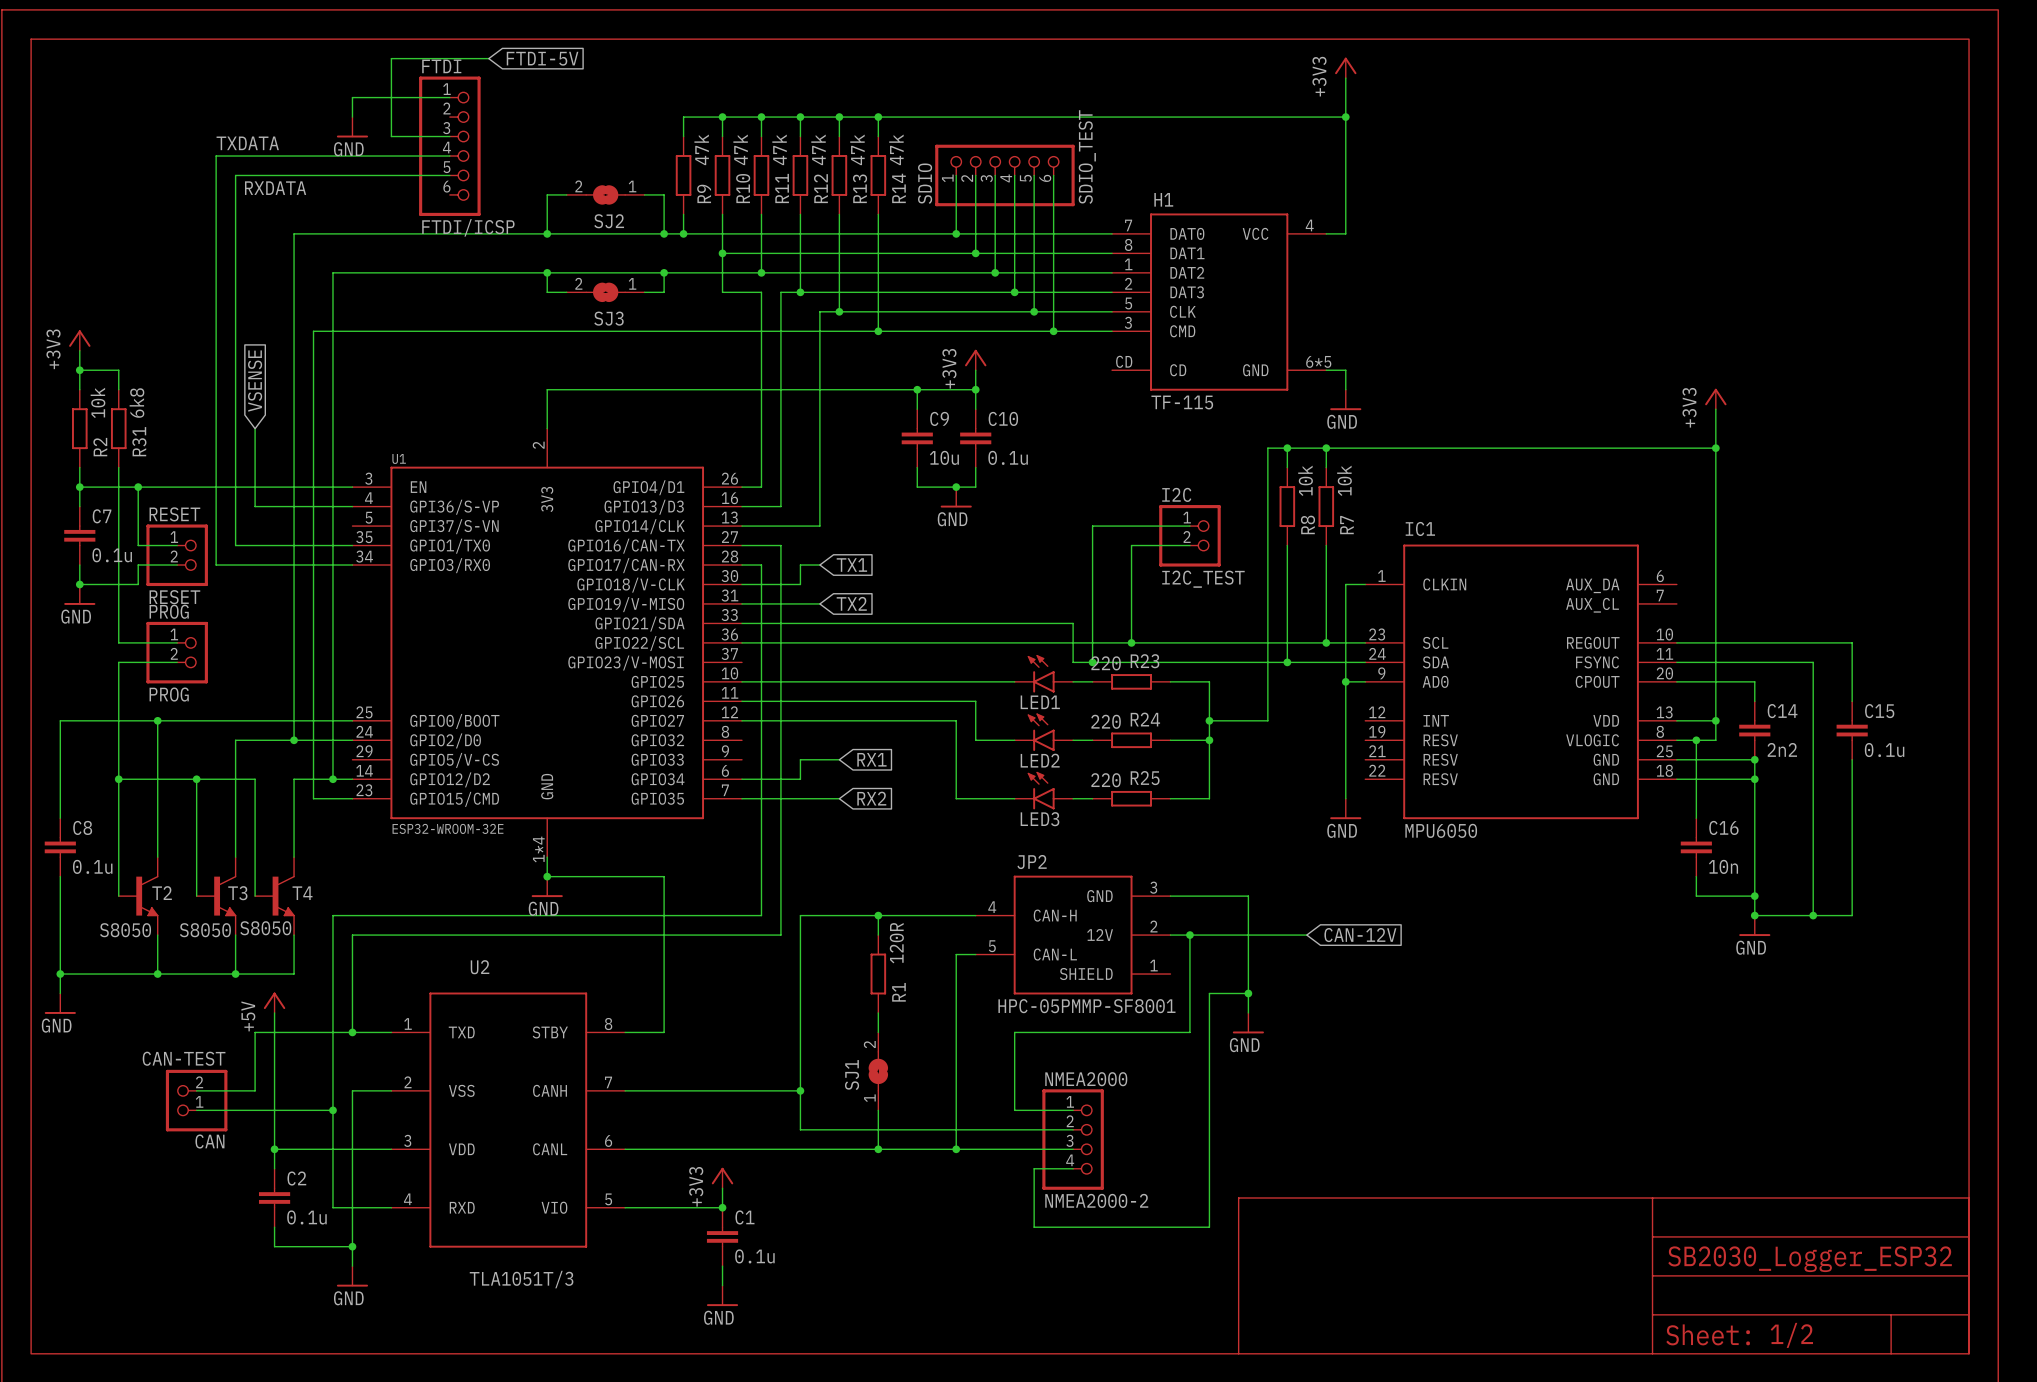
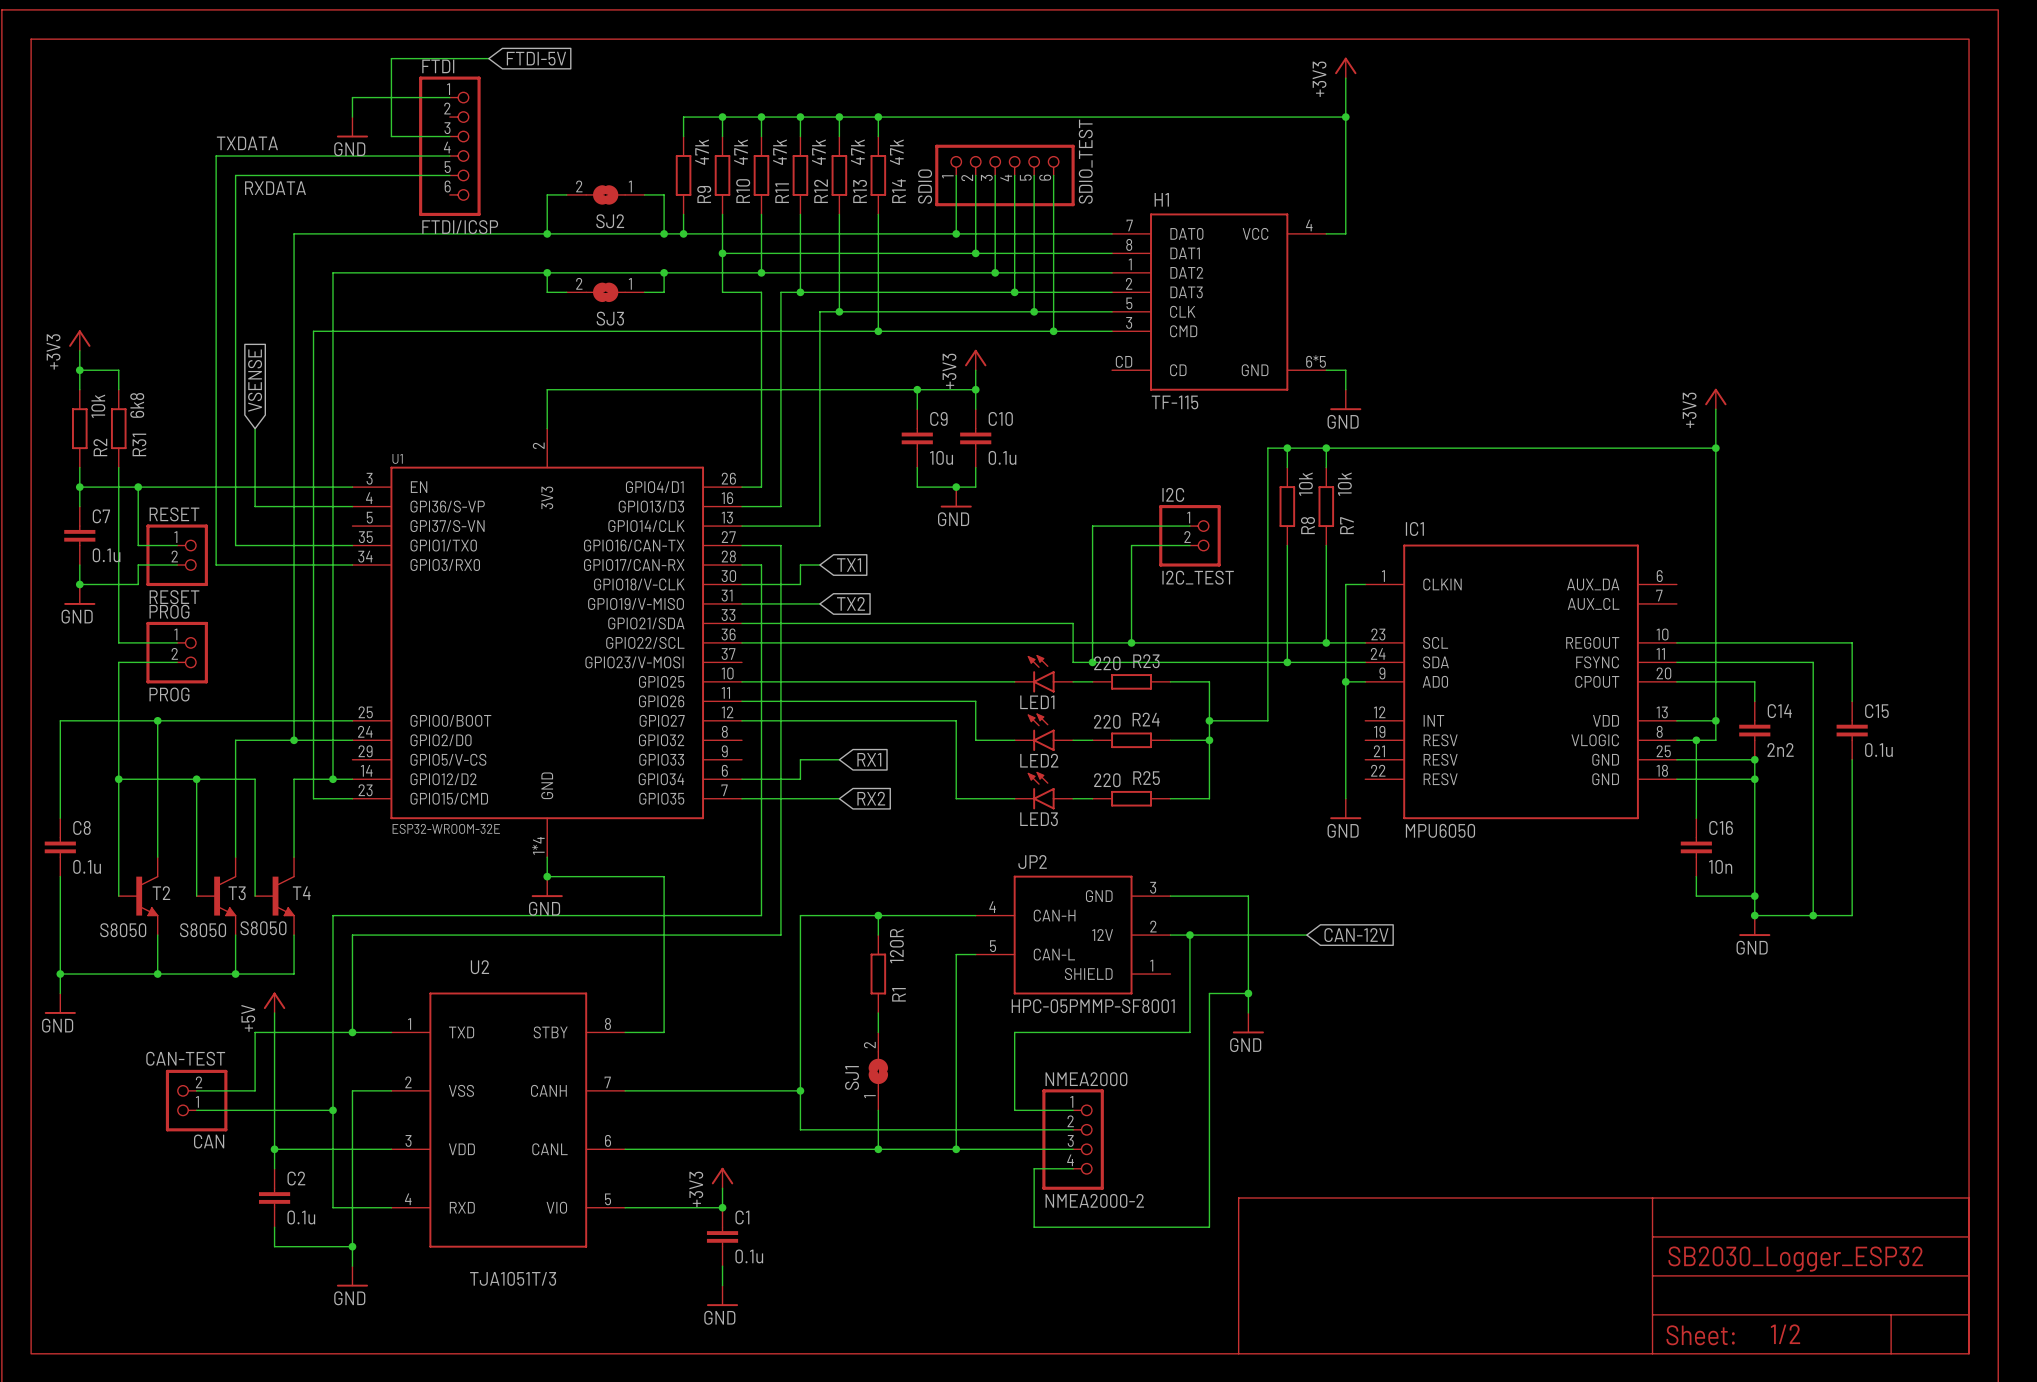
U2 value: TLA1051T/3 (521, 1279) -> TJA1051T/3 (513, 1278)

